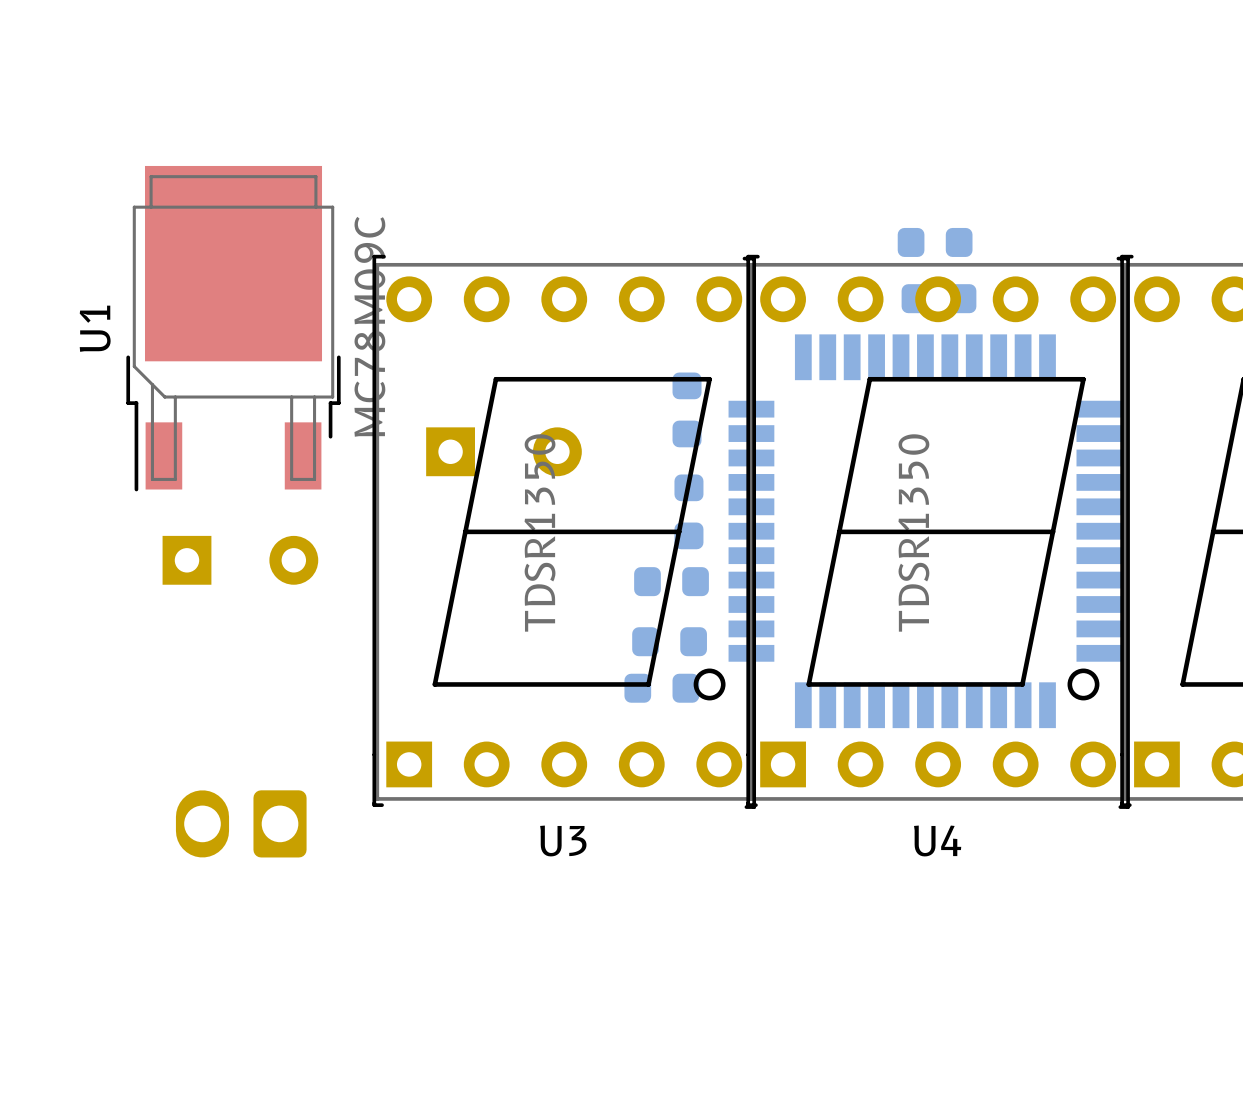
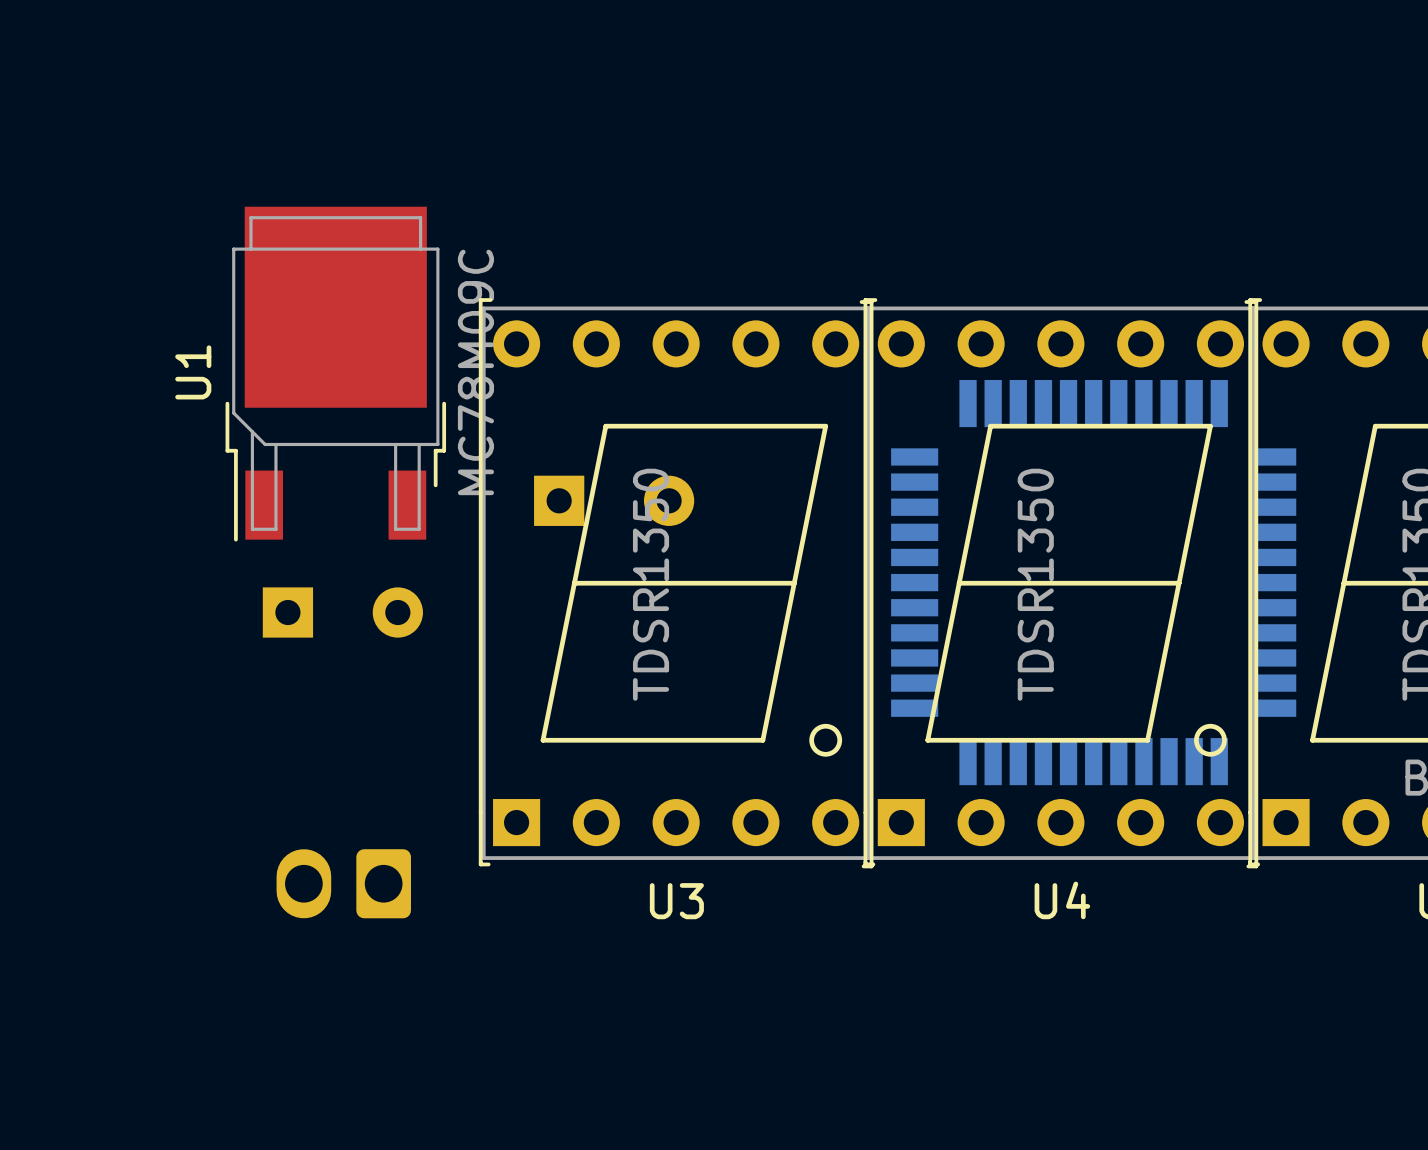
part: (935, 242) -> none
part: (938, 298) -> none
part: (687, 409) -> none
part: (688, 511) -> none
part position: (925, 531) -> (1093, 582)
part: (671, 581) -> none
part: (669, 641) -> none
part: (661, 688) -> none

